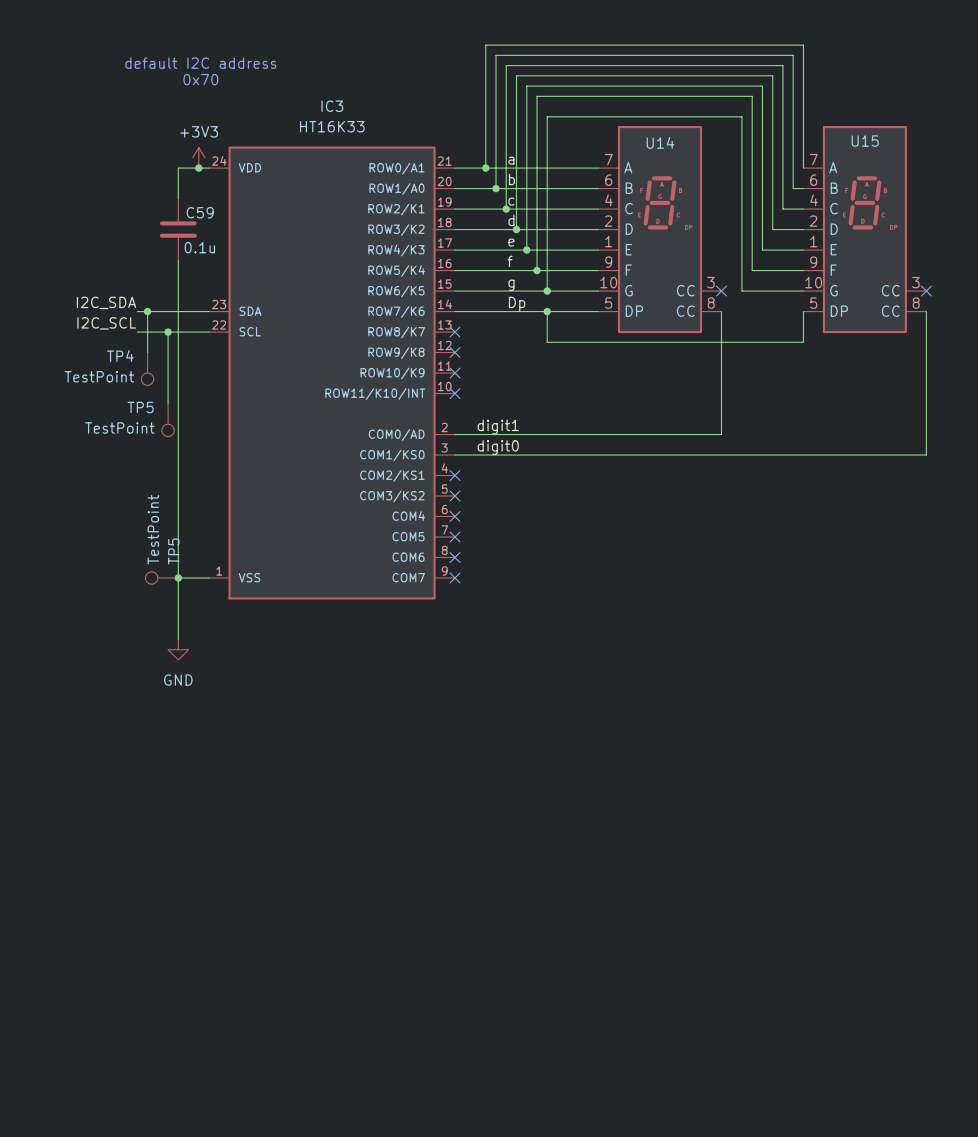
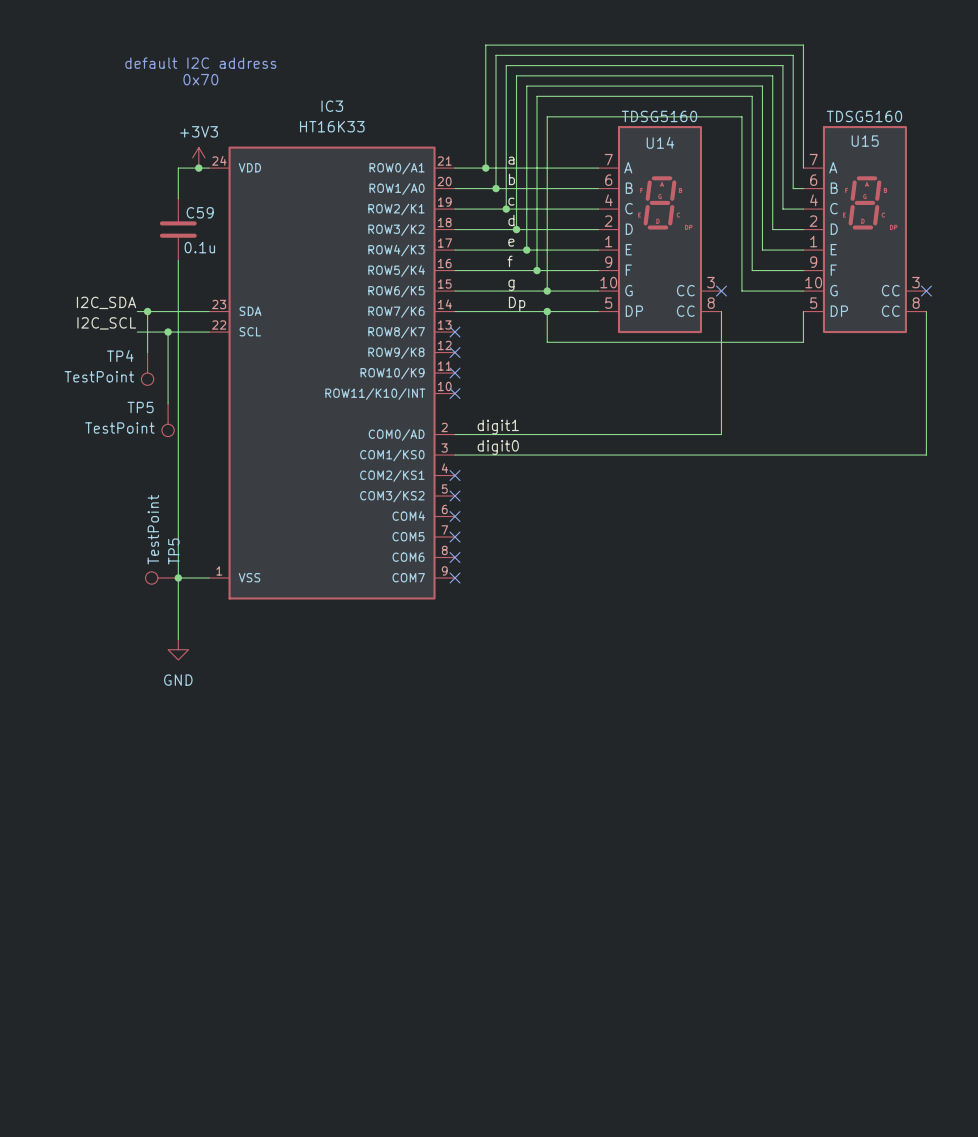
U14 value: none -> TDSG5160 (659, 116)
U15 value: none -> TDSG5160 (864, 116)

